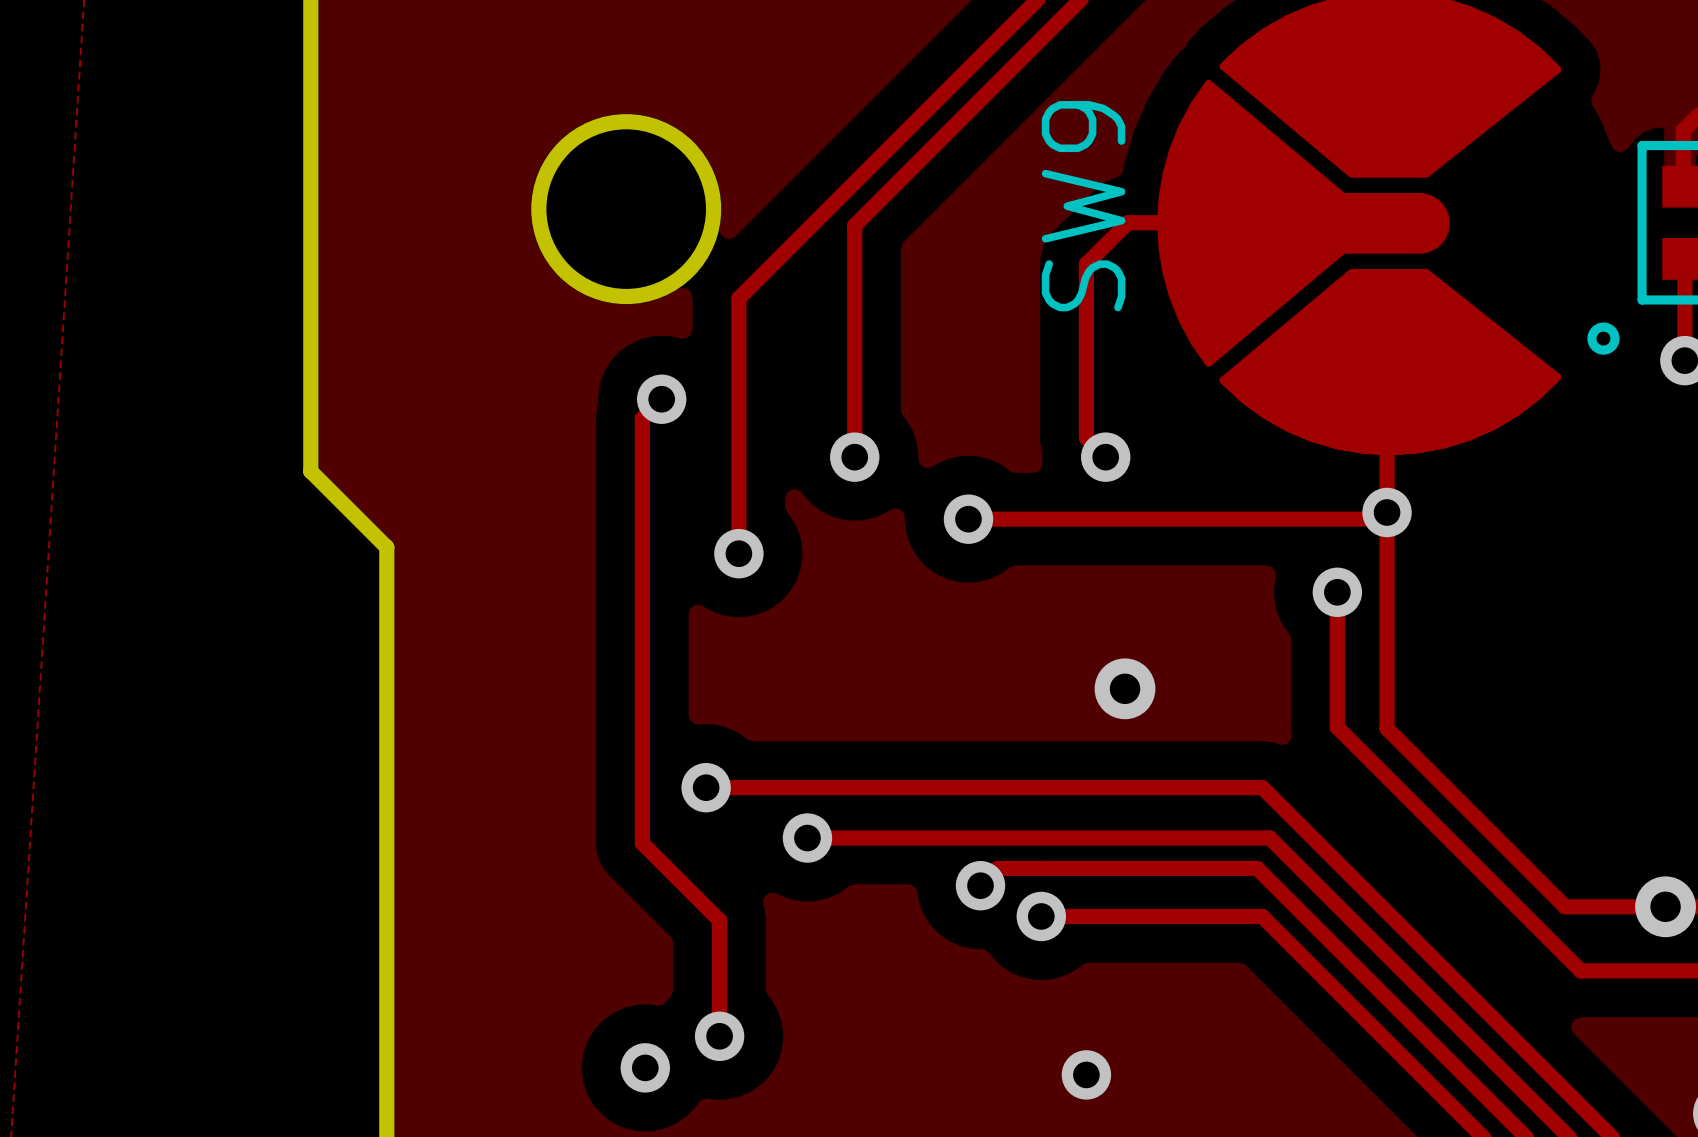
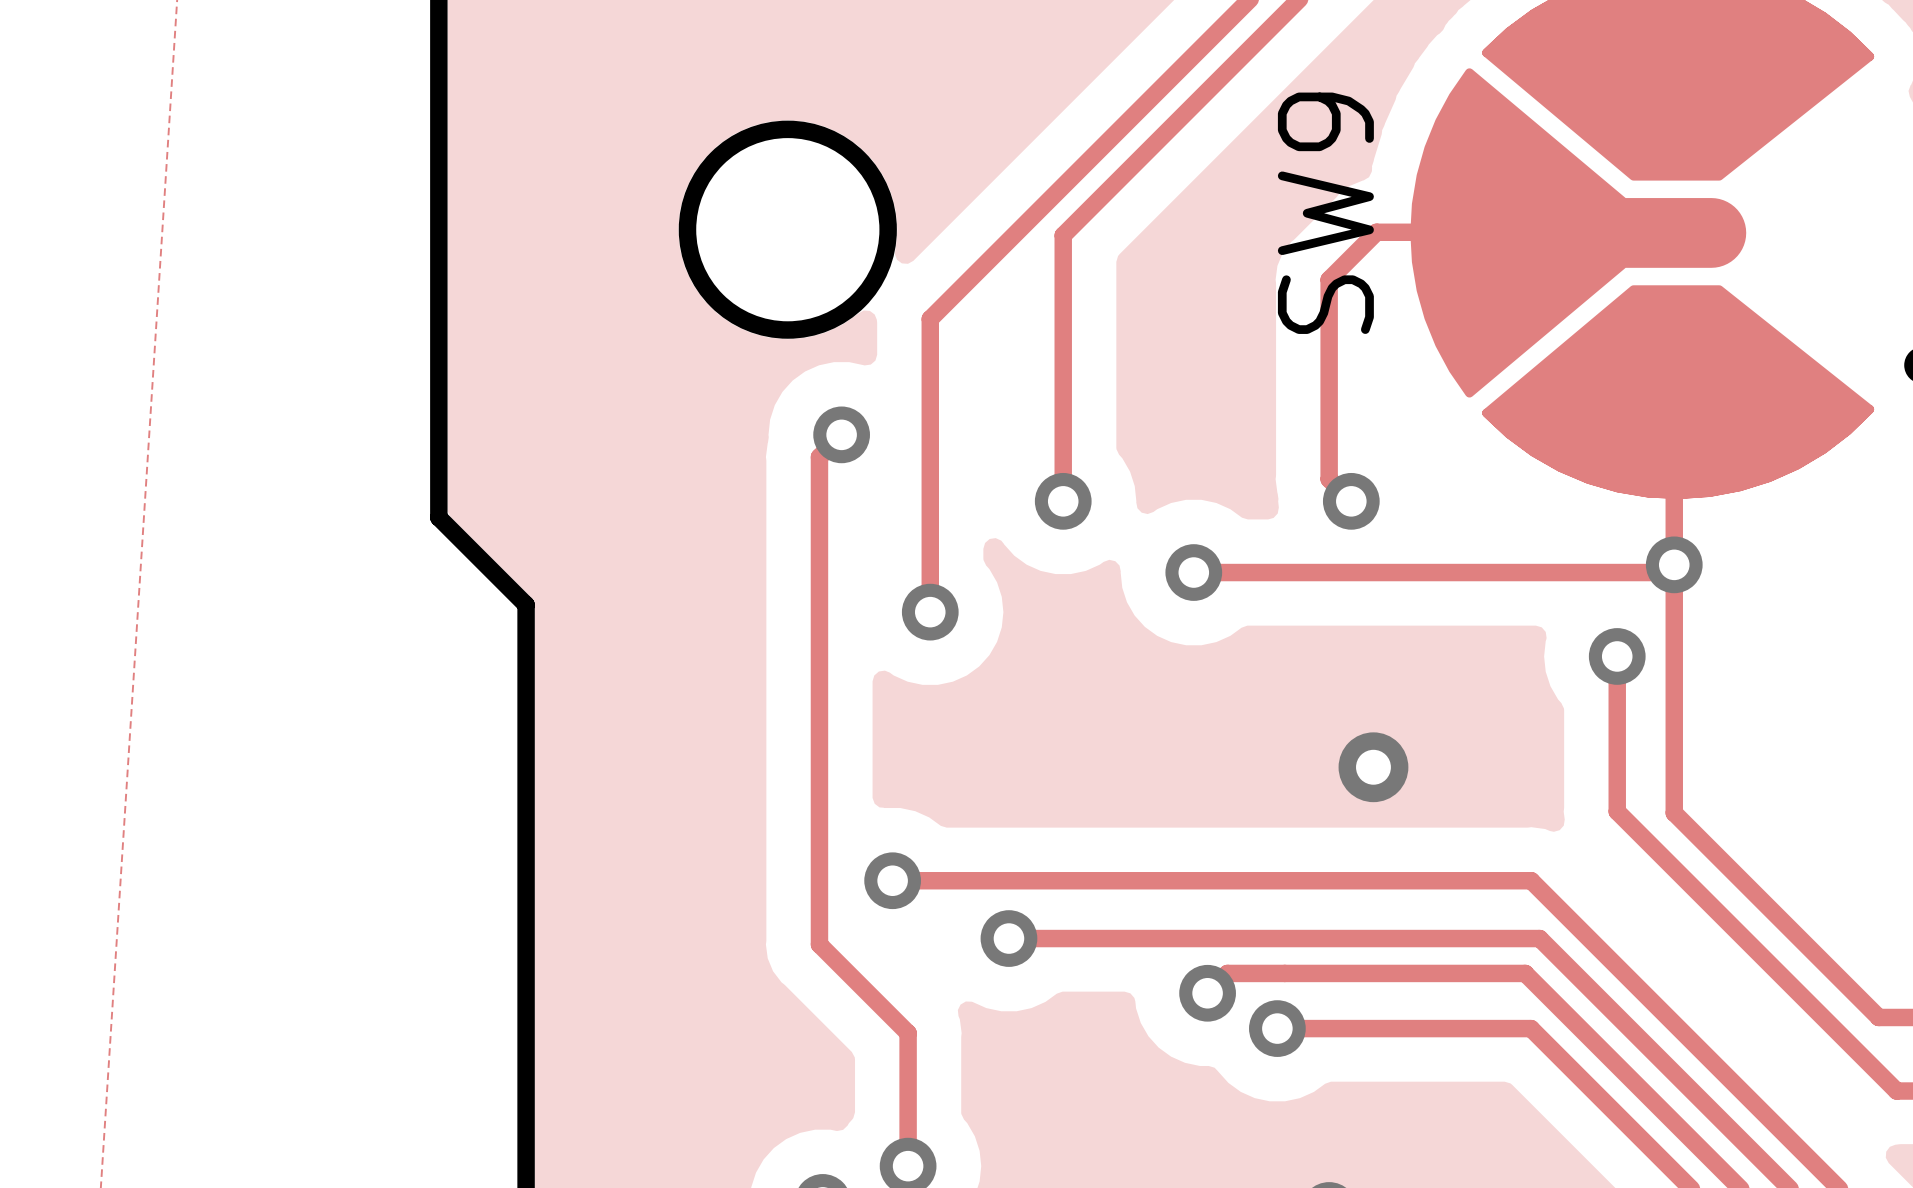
round board edge position: (626, 209) -> (787, 229)

